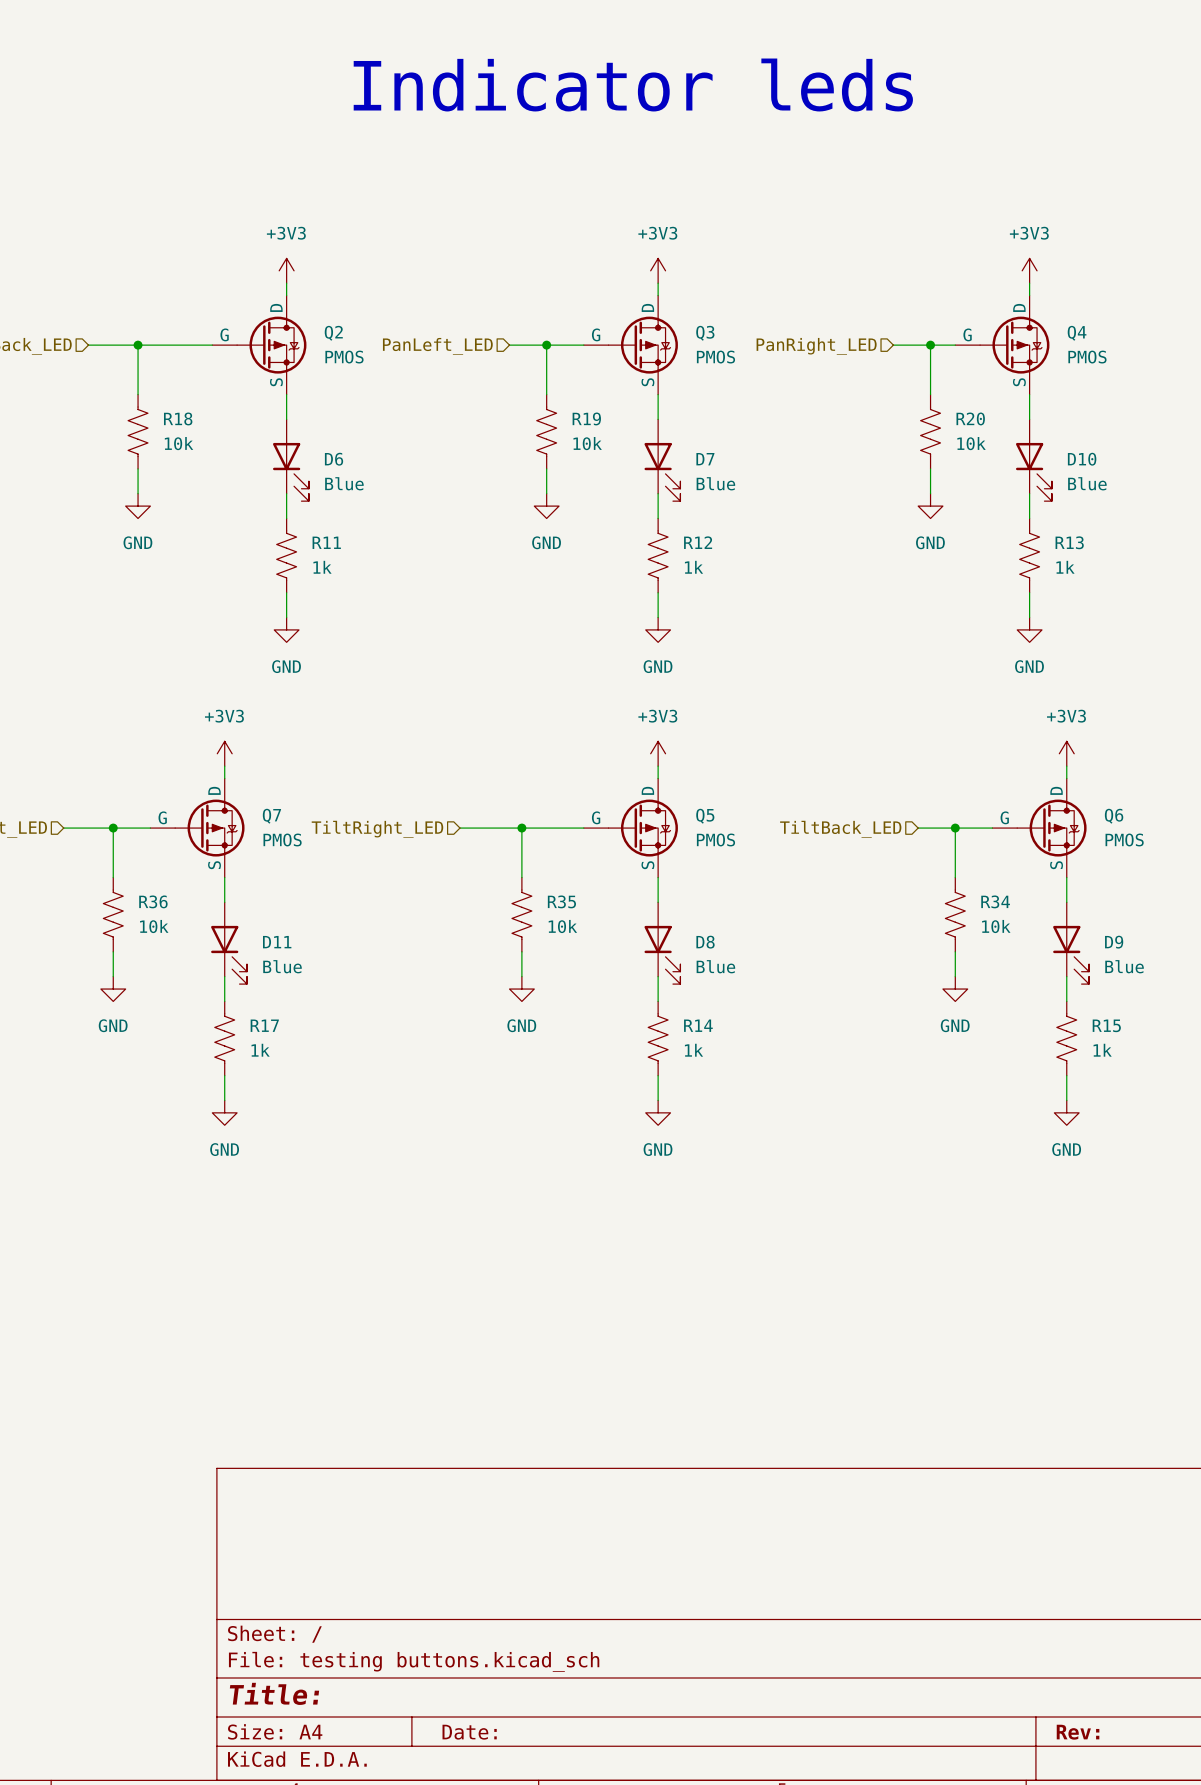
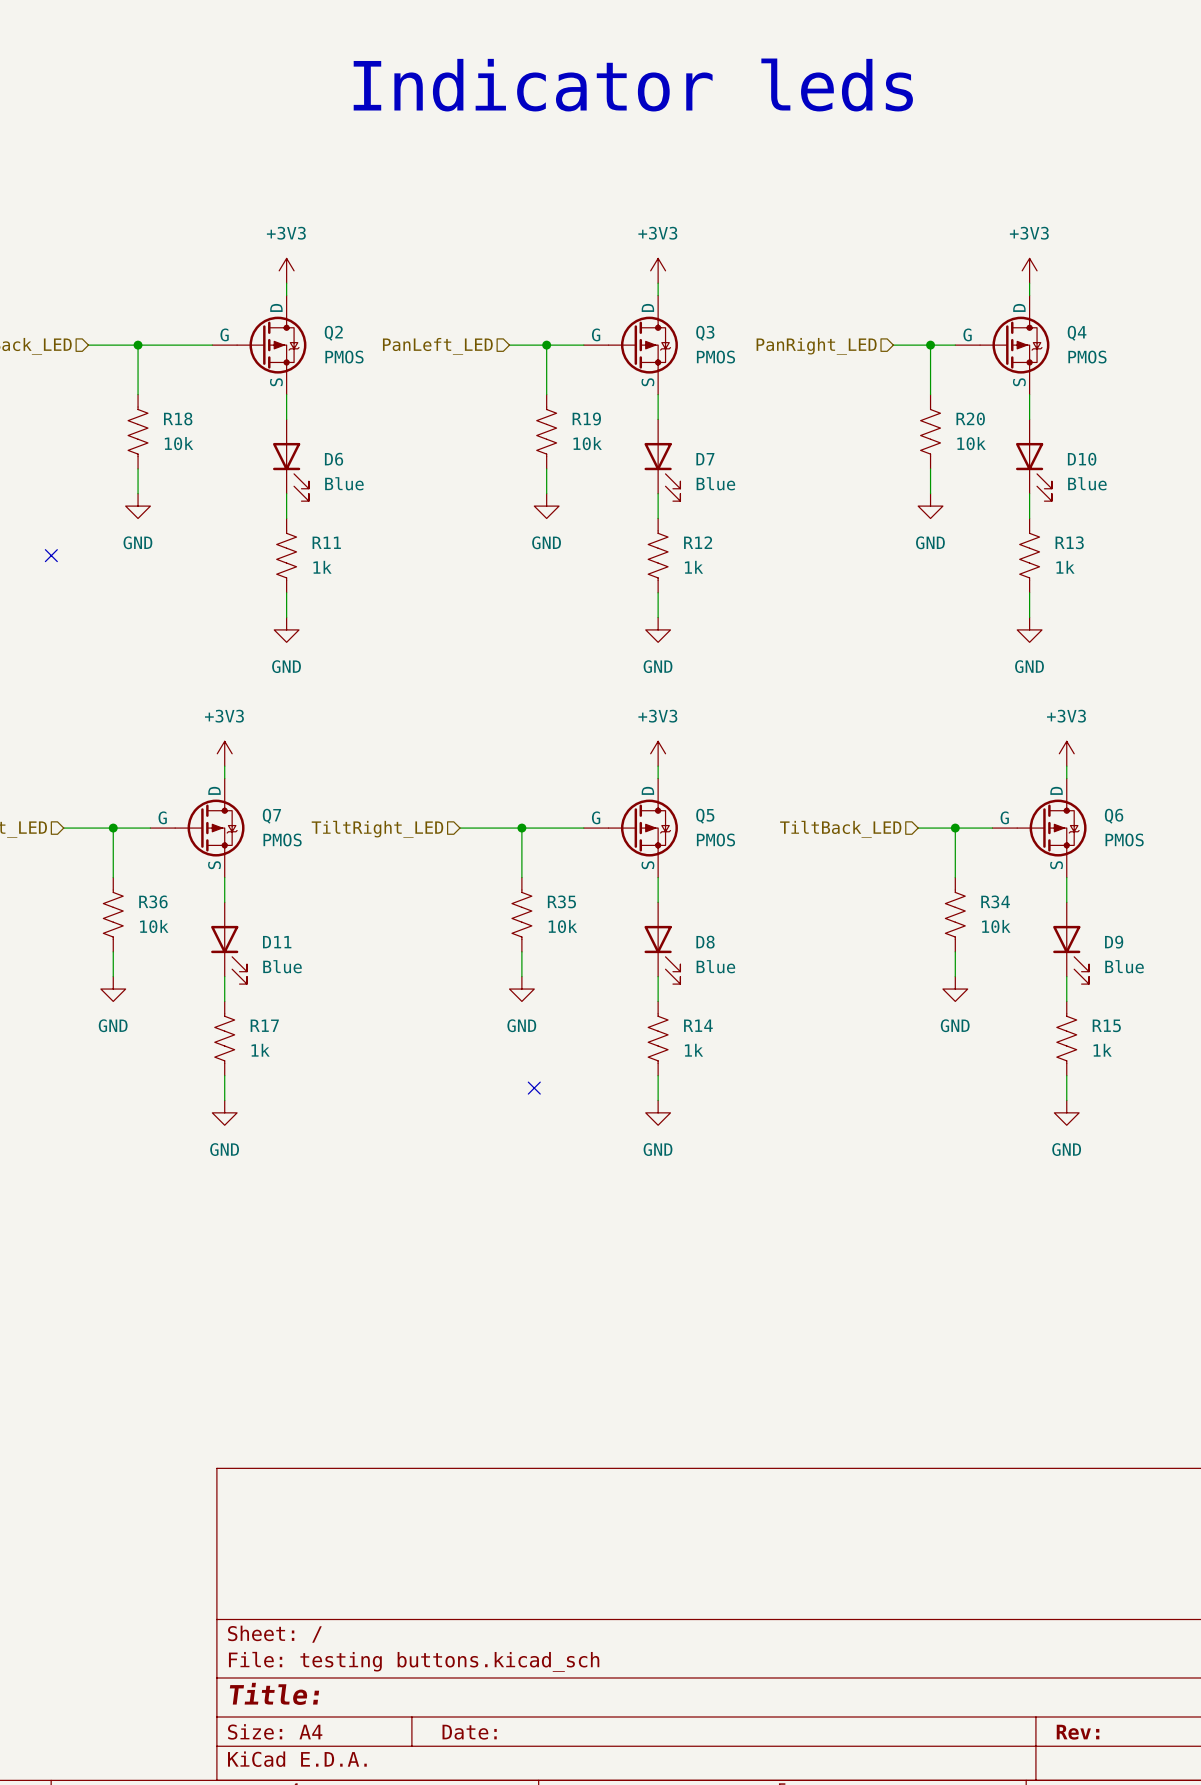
no-connect mark: none -> (51, 555)
no-connect mark: none -> (534, 1088)

